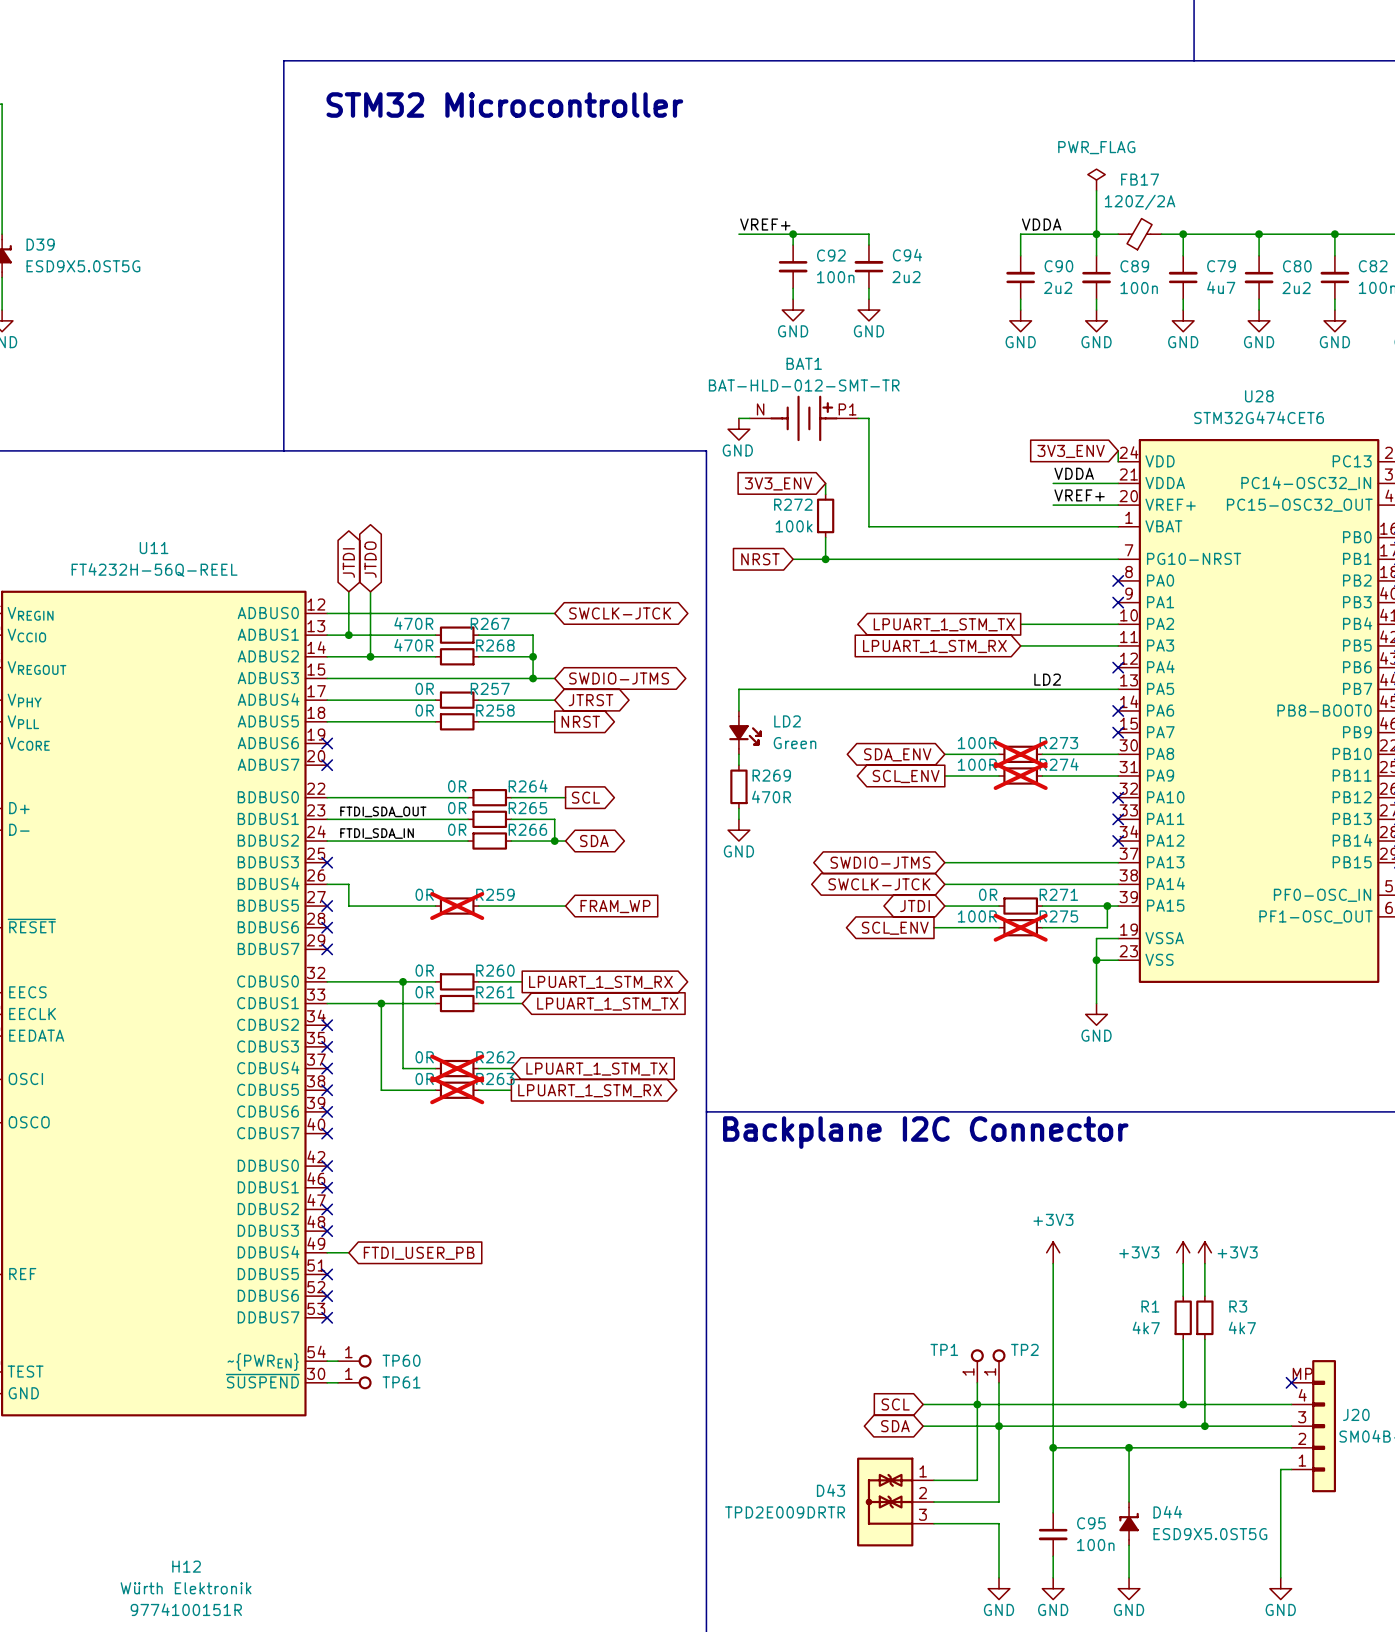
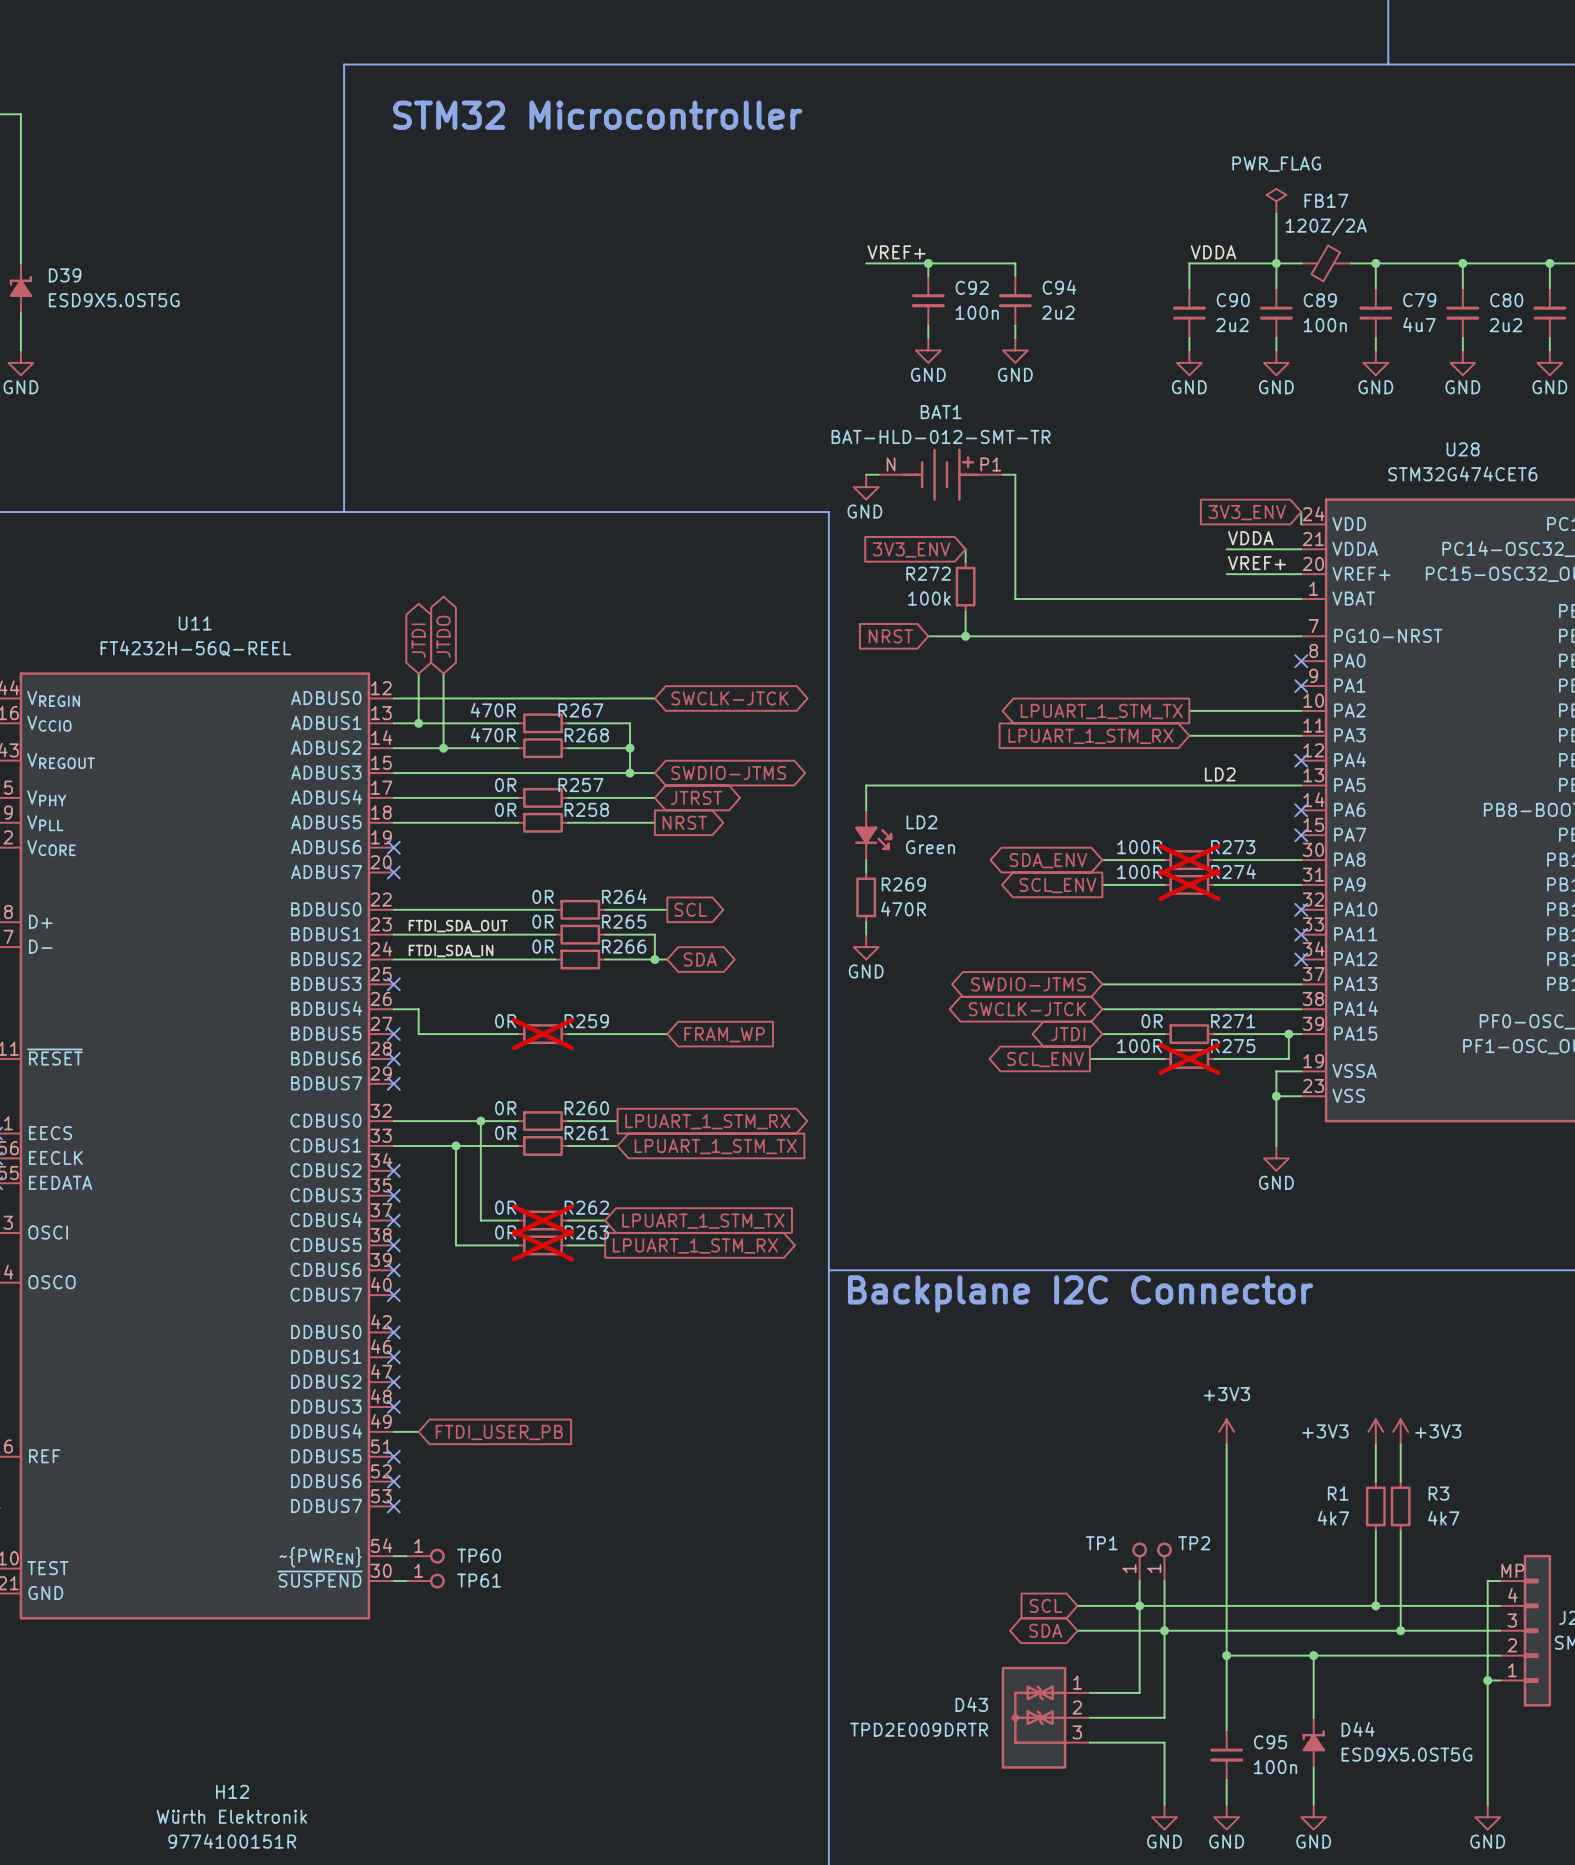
wire: none -> (1500, 1581) (1487, 1581) (1487, 1680)
no-connect mark: (1291, 1382) -> none
junction: none -> (1487, 1680)

